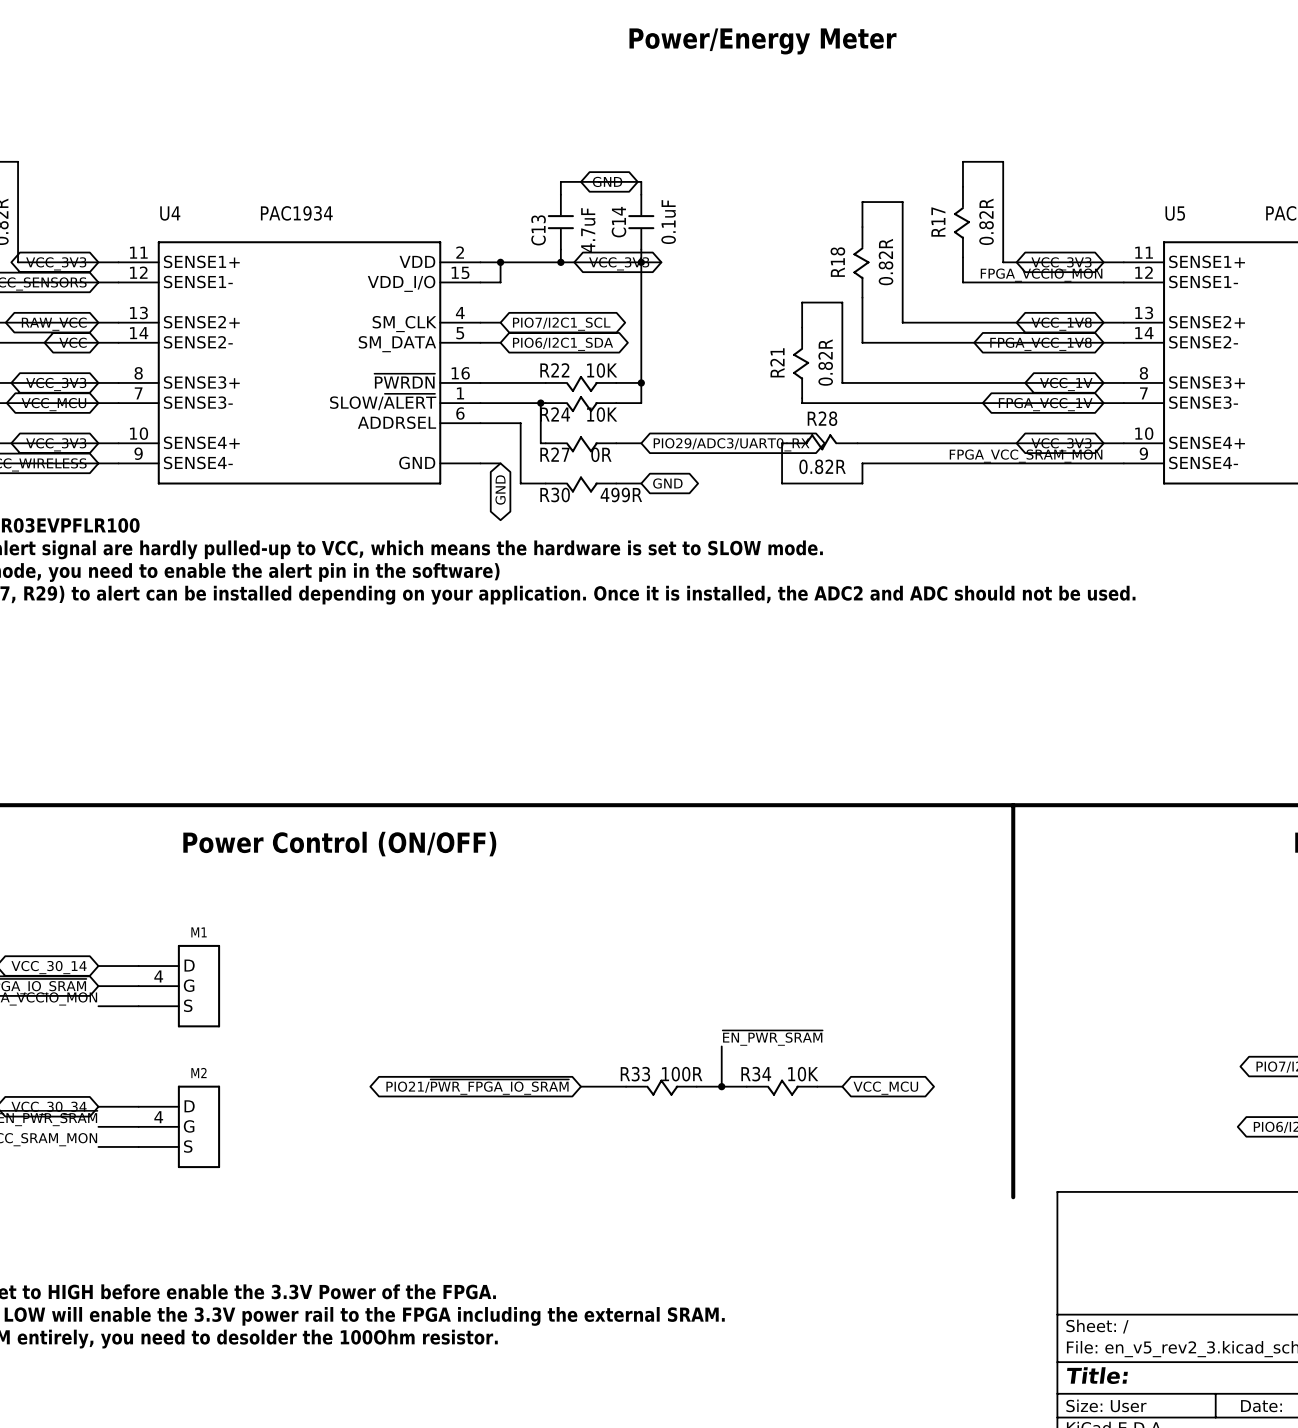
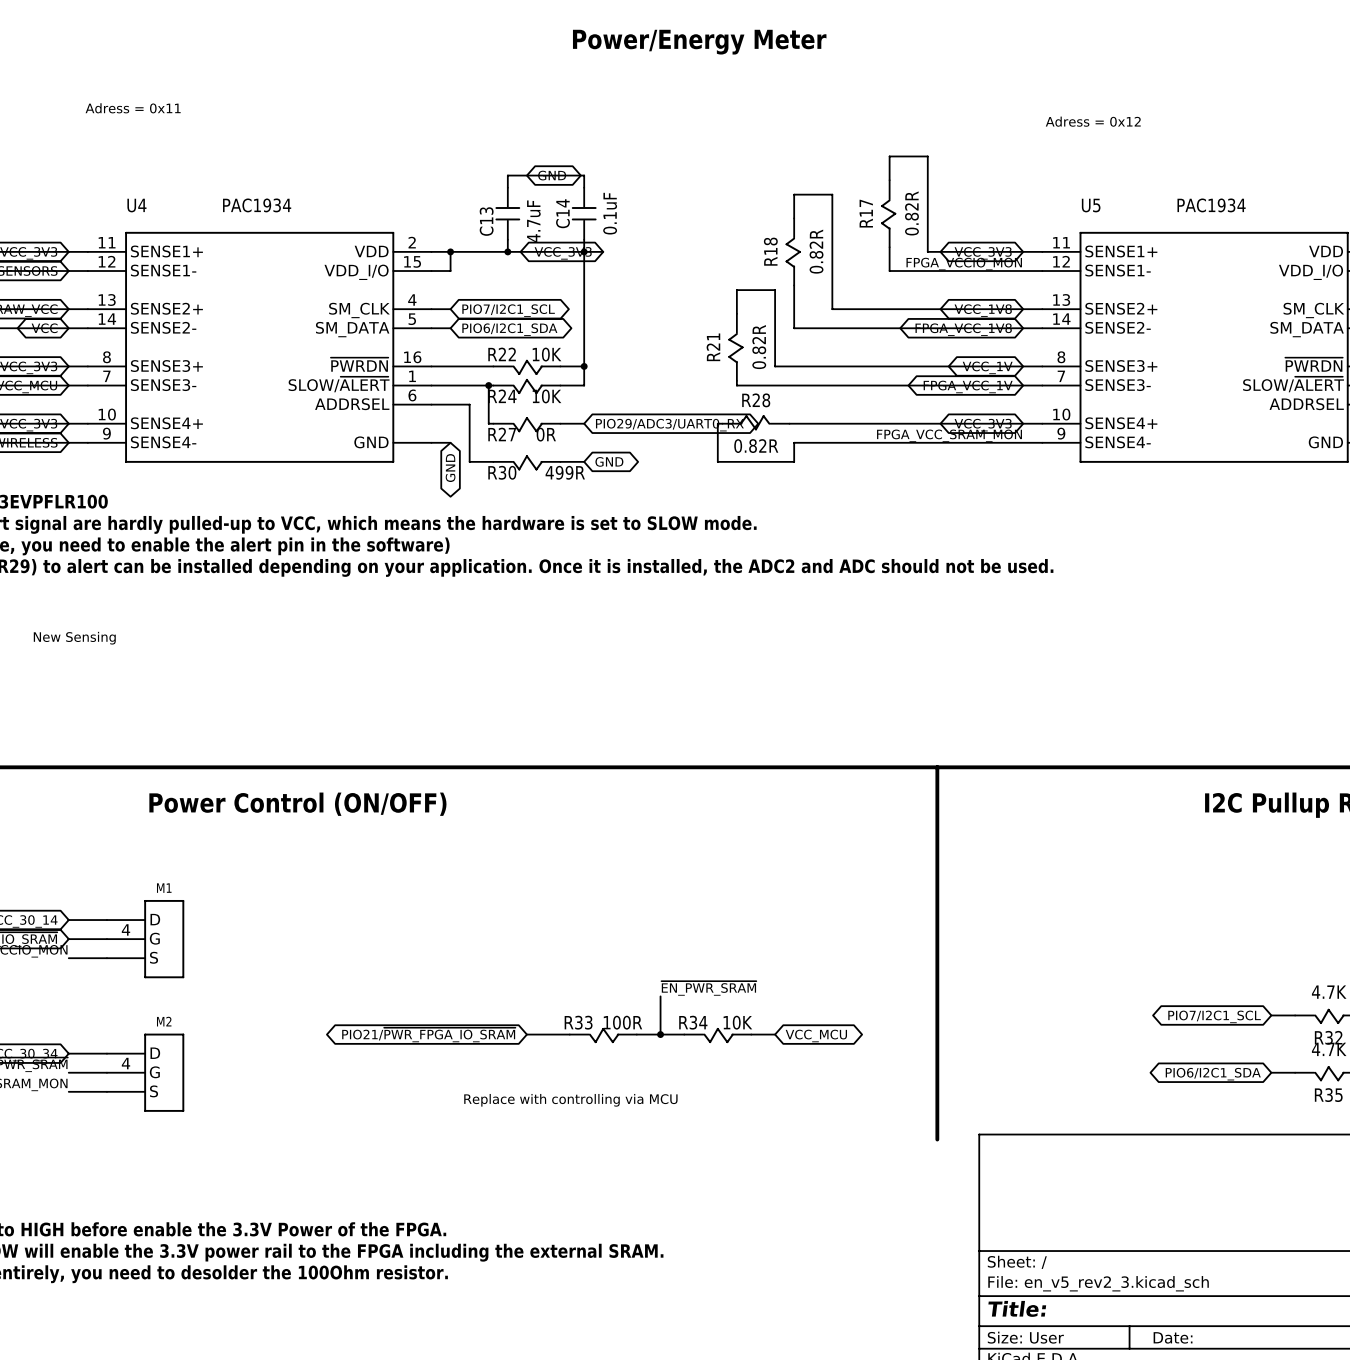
text: none -> Adress = 0x11 (133, 108)
text: none -> Adress = 0x12 (1093, 121)
text: none -> New Sensing (74, 638)
text: none -> Replace with controlling via MCU (570, 1100)

